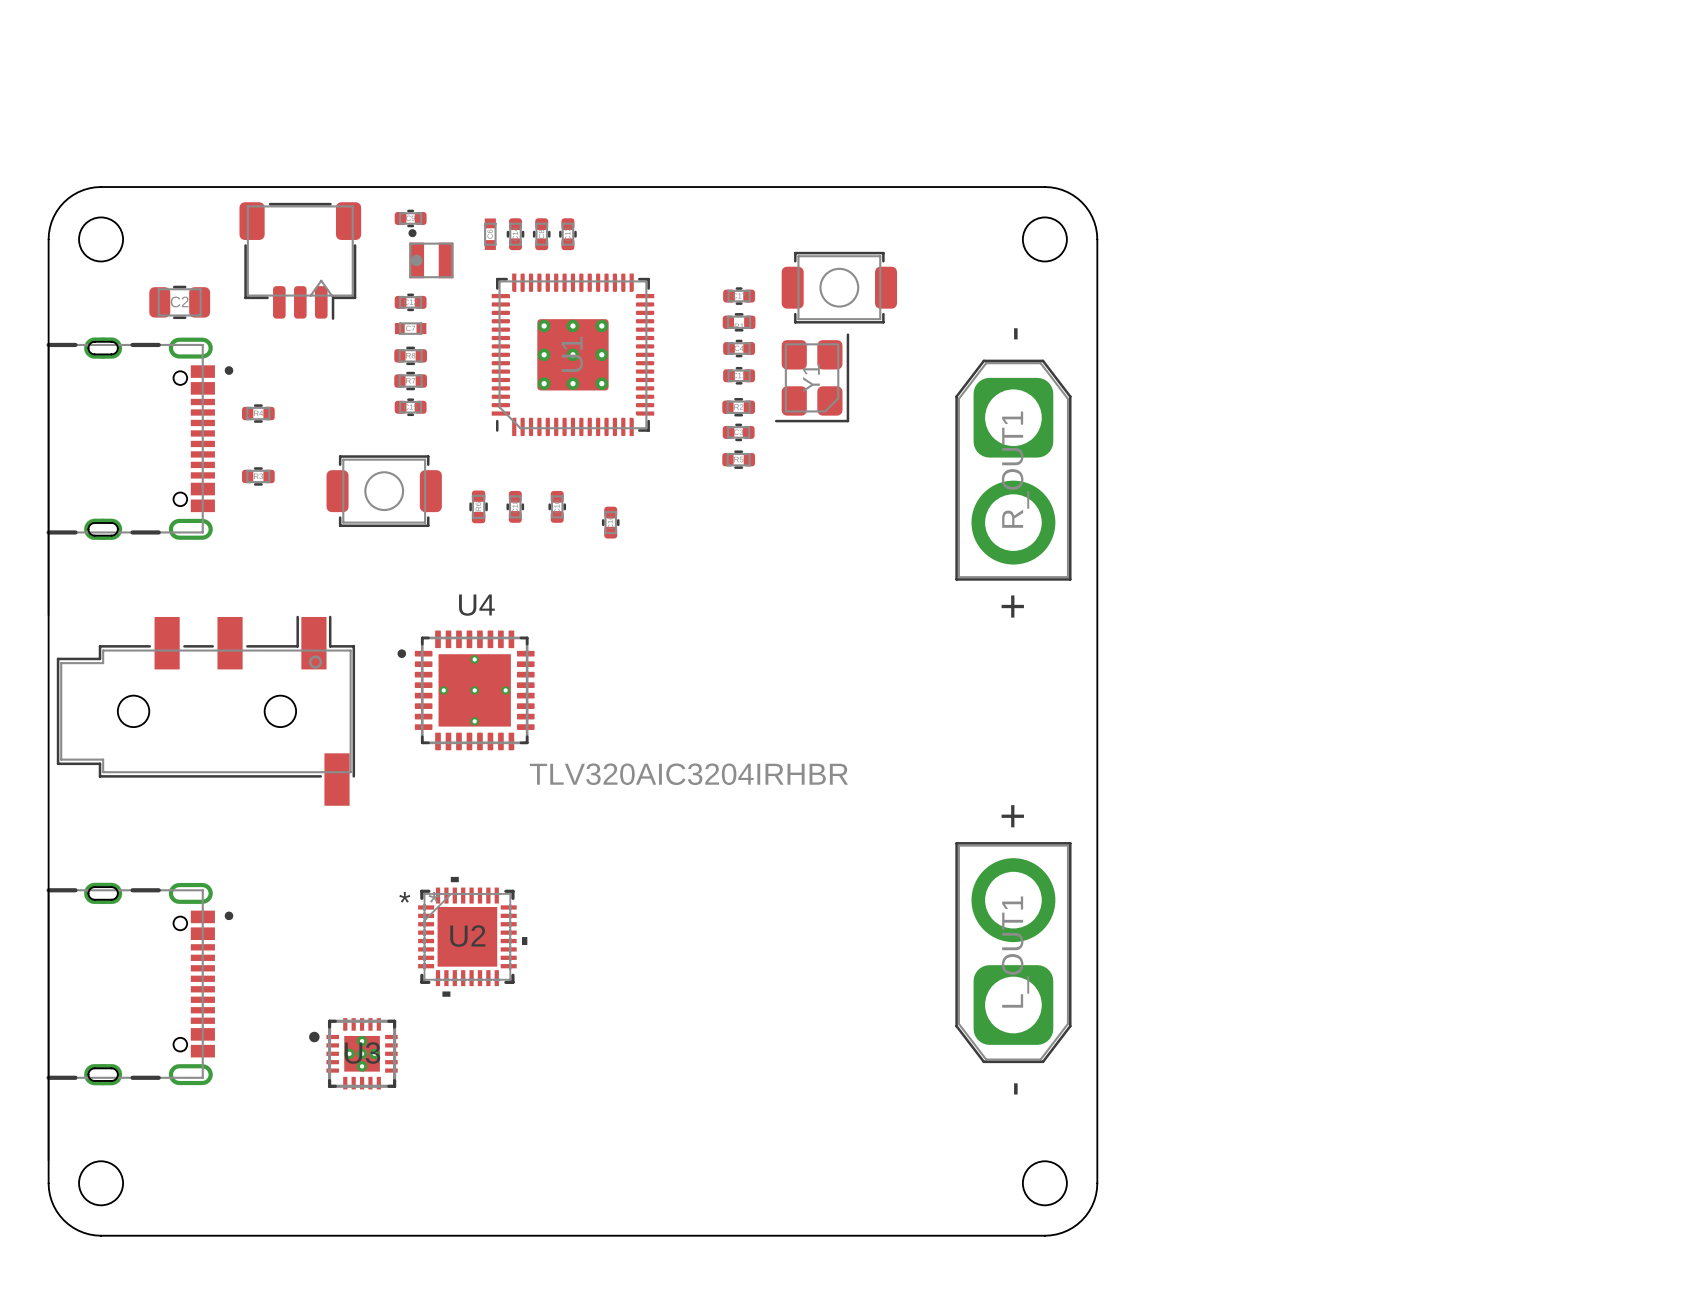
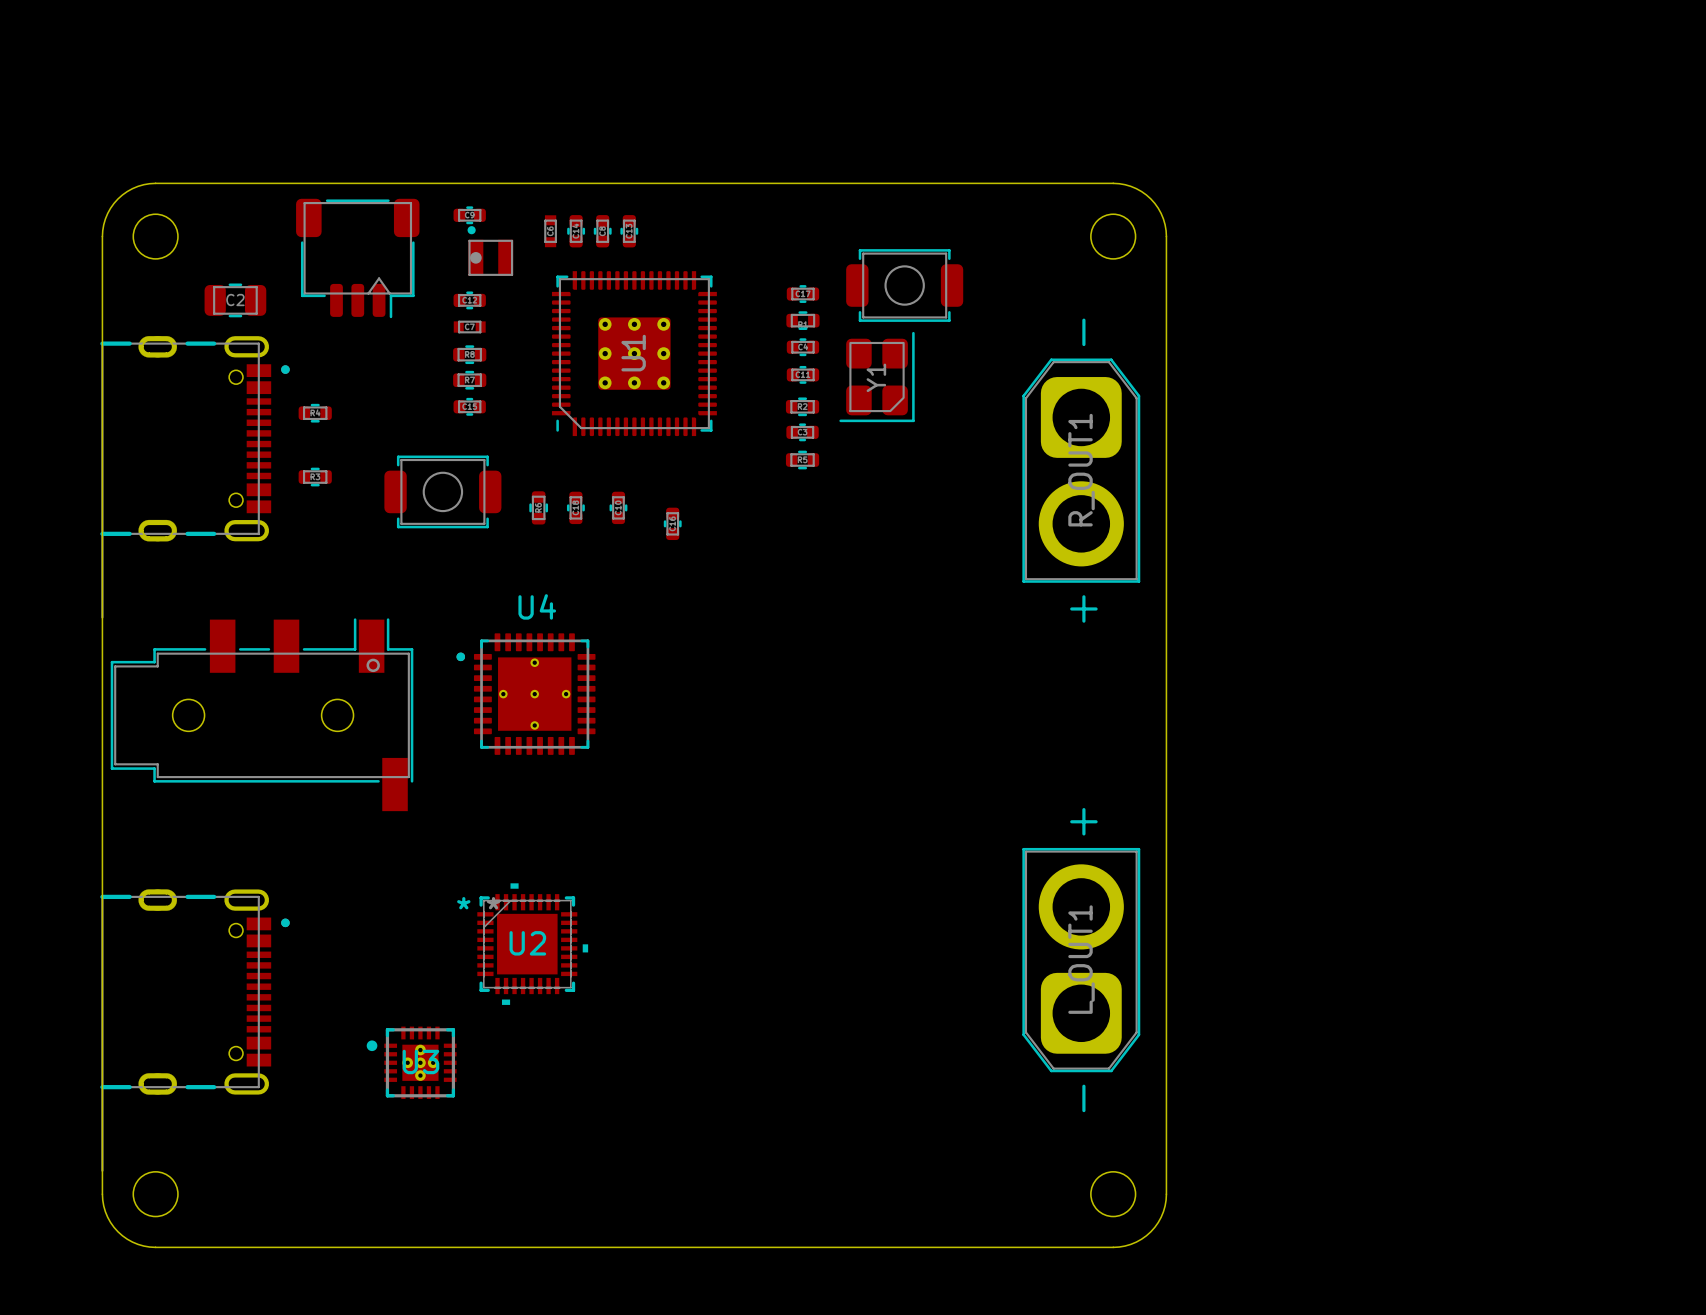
U4 value: TLV320AIC3204IRHBR (688, 774) -> none

